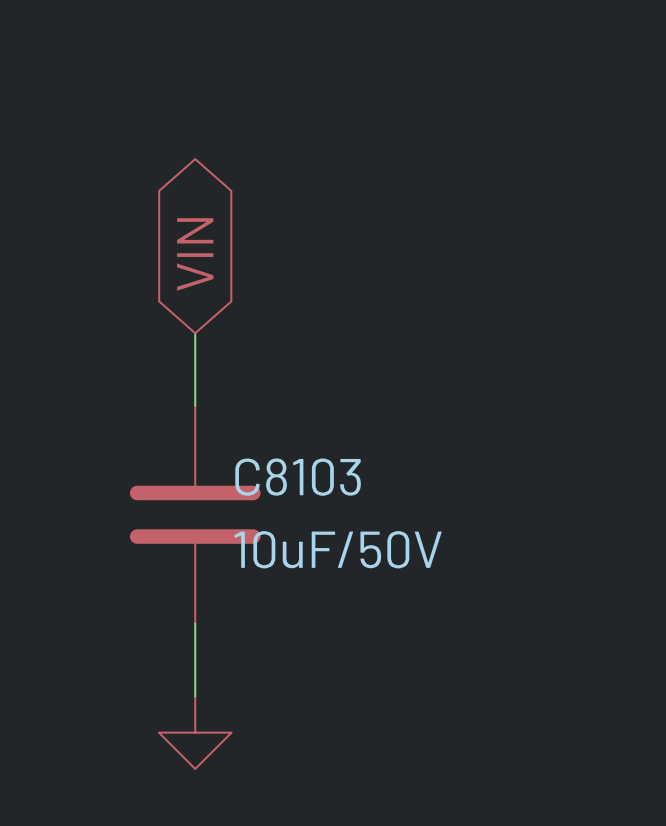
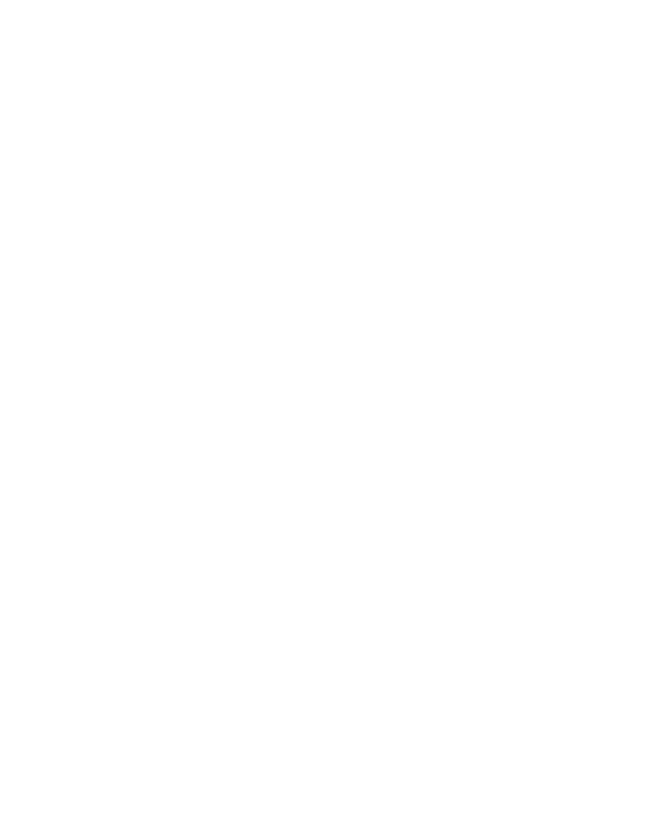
global label: VIN (195, 254) -> none
wire: (195, 333) (195, 405) -> none
C8103: 10uF/50V (195, 514) -> none
wire: (195, 623) (195, 696) -> none
power symbol: (195, 732) -> none

